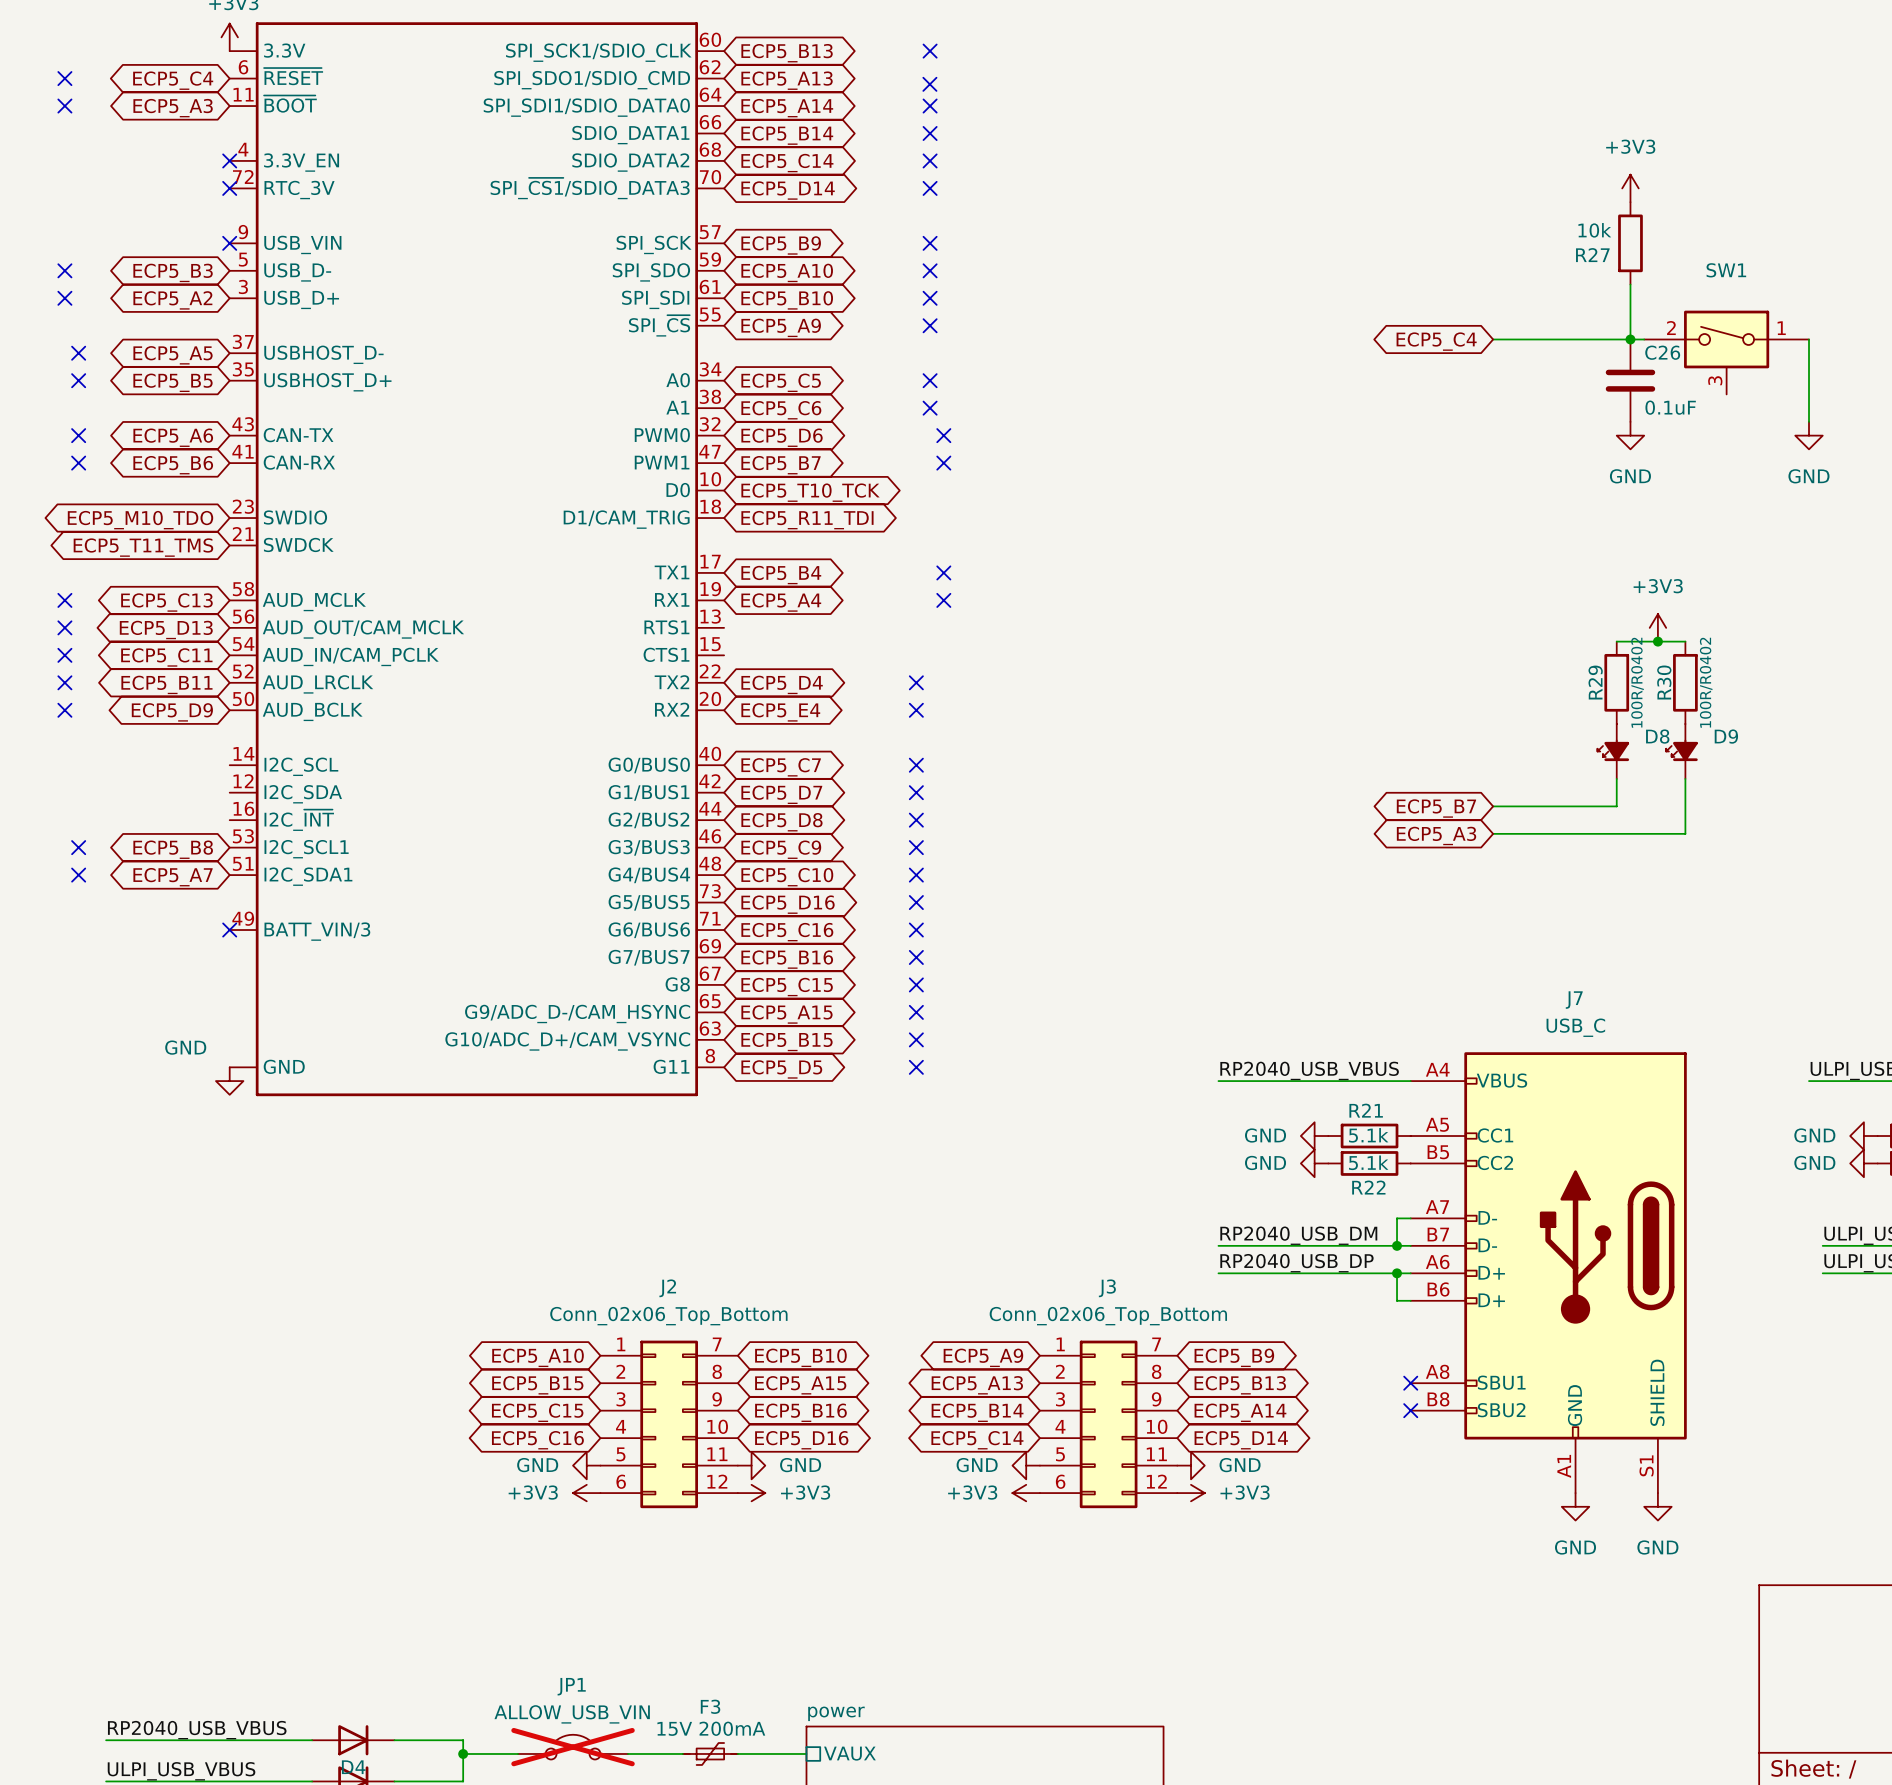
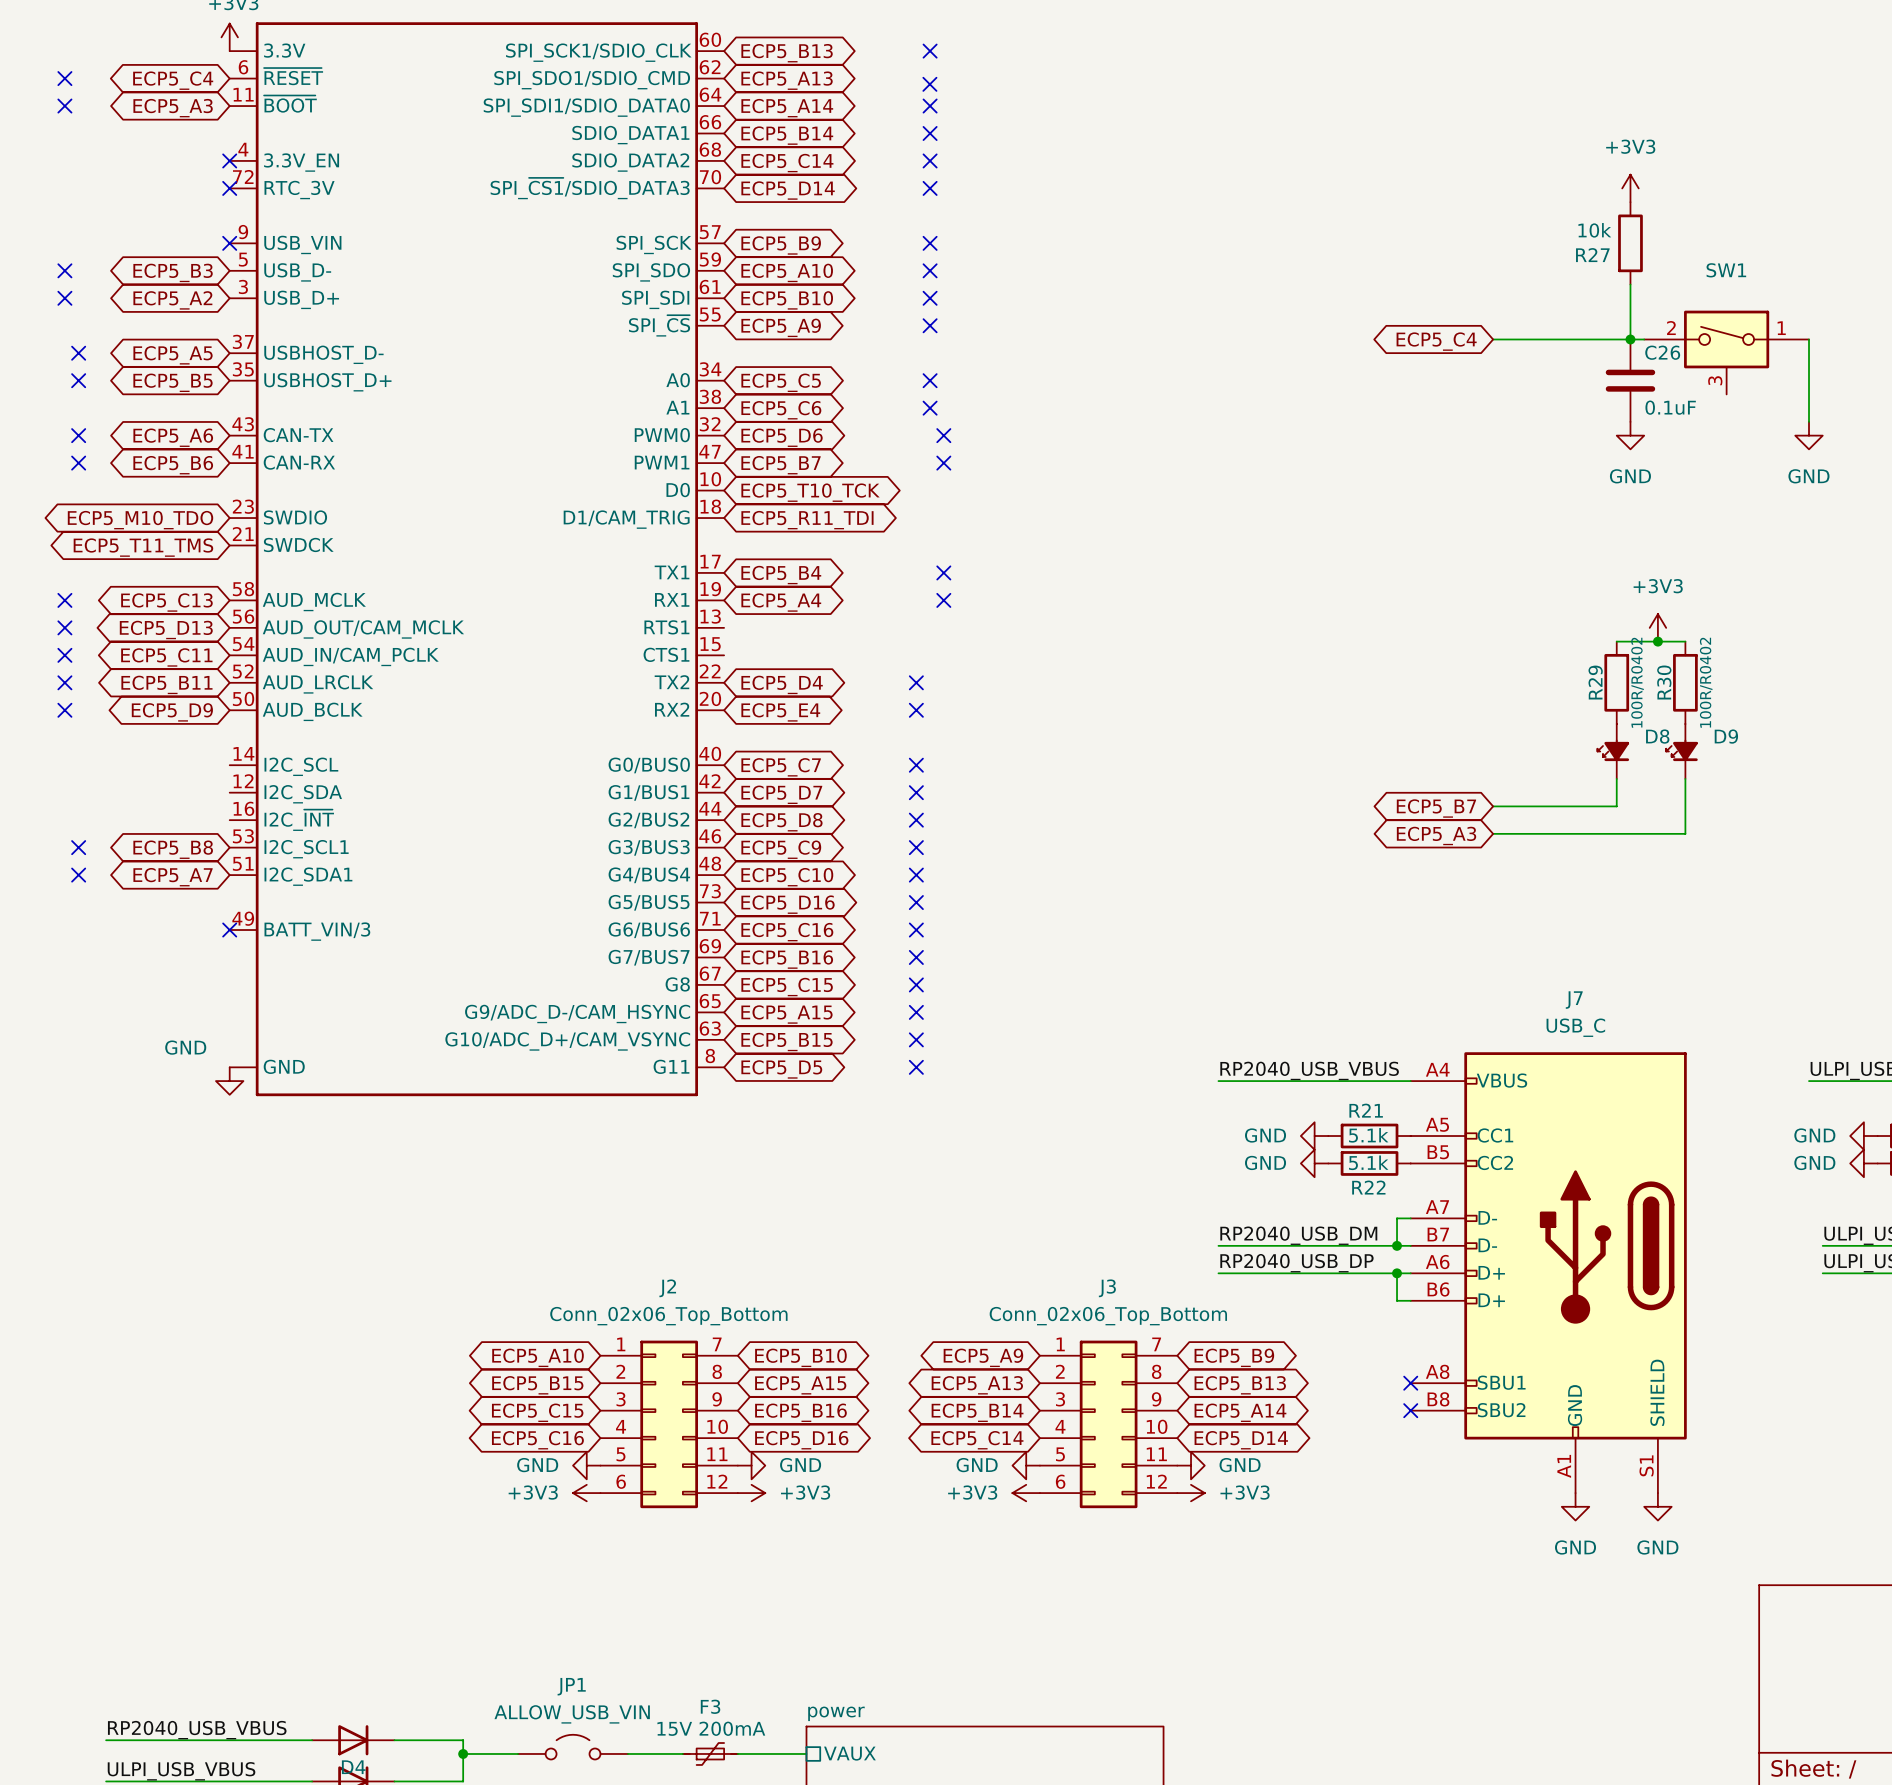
JP1 do-not-place cross: (573, 1747) -> none

